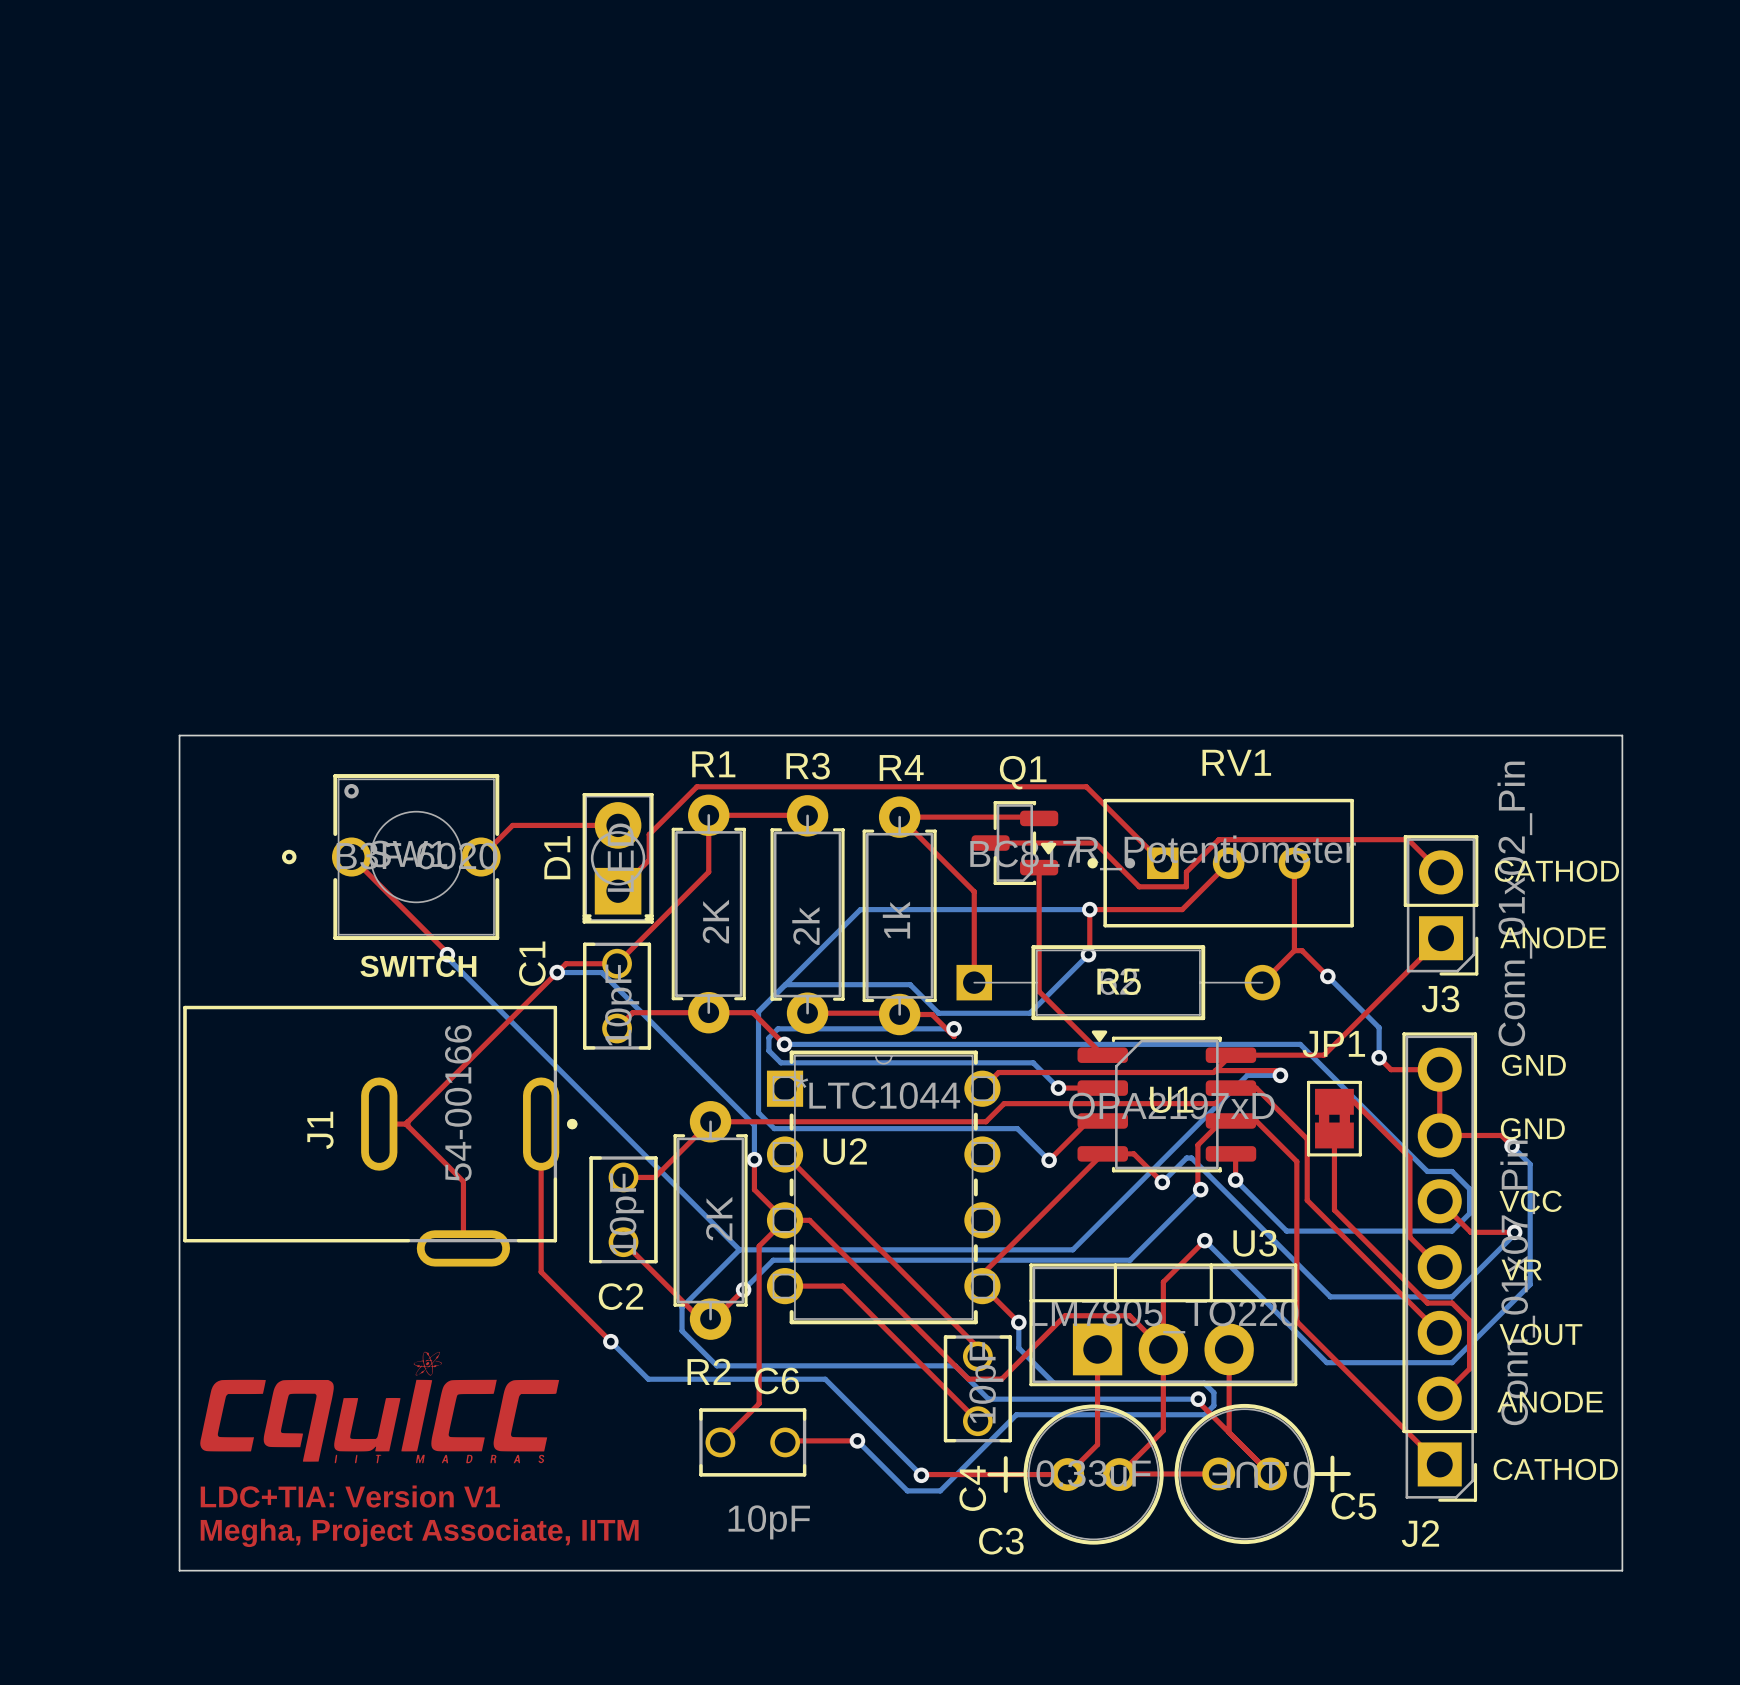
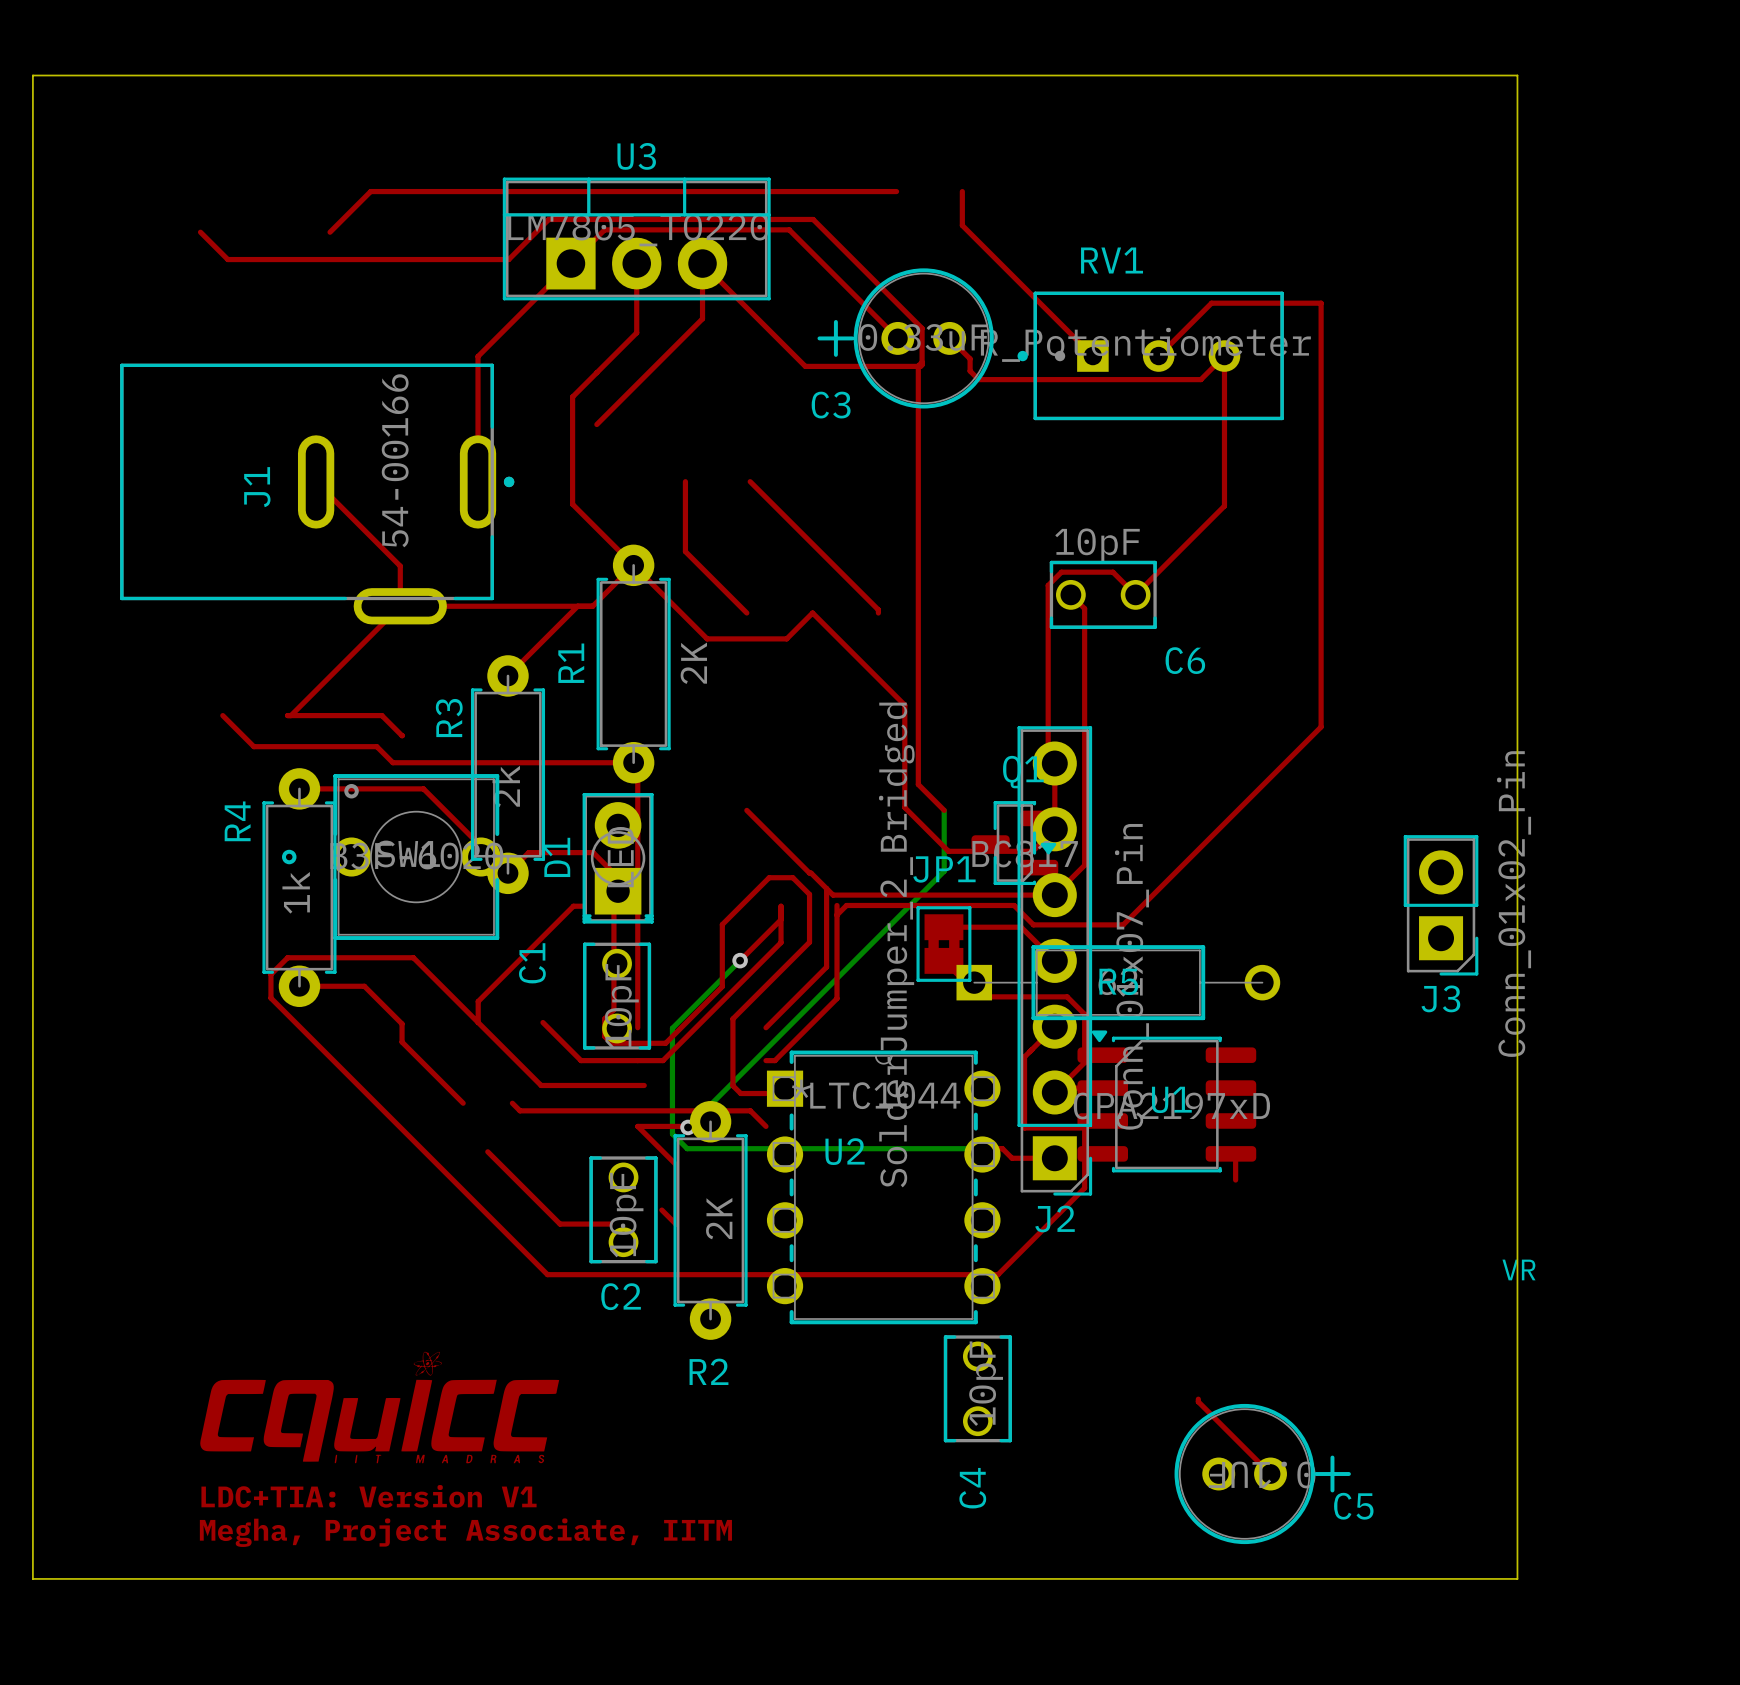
board edge: none -> (32, 75) (1517, 75) (1517, 1578) (32, 1578) (32, 75)
top track: none -> (896, 191) (370, 191) (330, 232)
top track: none -> (962, 191) (962, 225) (1092, 356)
top track: none -> (200, 232) (227, 259) (508, 259) (548, 219) (813, 219) (922, 328) (920, 366) (805, 366) (702, 263) (702, 318) (596, 424)
top track: none -> (636, 263) (636, 332) (572, 396) (572, 504) (707, 638) (786, 638) (812, 613) (904, 705) (904, 807) (948, 851) (1032, 851) (1054, 829) (1054, 763) (1048, 756) (1048, 585) (1061, 572) (1112, 572) (1135, 594) (1224, 506) (1224, 356) (1200, 379) (978, 379) (970, 371) (970, 358) (949, 338)
top track: none -> (897, 338) (789, 229) (604, 229) (478, 356) (478, 481)
top track: none -> (1158, 356) (1211, 303) (1321, 303) (1321, 726) (1123, 924) (1033, 924) (1014, 905) (846, 905) (836, 915)
top track: none -> (922, 362) (918, 366) (918, 784) (944, 810)
top track: none -> (316, 481) (400, 566) (400, 606)
top track: none -> (685, 481) (685, 551) (746, 613)
top track: none -> (750, 481) (878, 609) (878, 613)
top track: none -> (633, 565) (592, 606) (400, 606)
top track: none -> (1070, 594) (1084, 608) (1084, 865) (1054, 895) (833, 895) (746, 810)
top track: none -> (400, 606) (290, 715)
top track: none -> (577, 606) (507, 675)
top track: none -> (222, 715) (253, 746) (376, 746) (392, 762) (633, 762) (637, 766) (637, 1027)
top track: none -> (287, 715) (381, 715) (402, 735)
board edge: (179, 735) (1622, 735) (1622, 1570) (179, 1570) (179, 735) -> none
RV1 name position: RV1 (1236, 762) -> RV1 (1112, 260)
R1 name rotation: 0° (713, 764) -> 90° counterclockwise (571, 663)
R1 name position: R1 (713, 764) -> R1 (571, 663)
R3 name rotation: 0° (808, 766) -> 90° counterclockwise (449, 718)
R3 name position: R3 (808, 766) -> R3 (449, 718)
R4 name rotation: 0° (901, 767) -> 90° counterclockwise (237, 821)
R4 name position: R4 (901, 767) -> R4 (237, 821)
top track: none -> (299, 788) (423, 788) (507, 873) (528, 852) (593, 852) (613, 873) (613, 1009) (604, 1018) (604, 1036) (611, 1043) (665, 1043) (722, 986) (722, 924) (769, 877) (792, 877) (809, 894) (809, 942) (732, 1018) (732, 1085) (740, 1093) (765, 1093)
bottom track: none -> (944, 810) (944, 871) (688, 1127)
top track: (797, 815) (708, 815) (708, 872) (617, 963) (566, 963) (405, 1124) (379, 1124) -> none
top track: (1037, 817) (899, 817) (974, 891) (974, 982) (963, 972) -> none
top track: (618, 825) (512, 825) (481, 857) -> none
top track: (990, 843) (1095, 843) (1139, 886) (1186, 886) (1186, 872) (1218, 839) (1408, 839) (1441, 872) -> none
top track: (351, 857) (447, 954) -> none
top track: (1162, 863) (1086, 786) (696, 786) (649, 834) (649, 860) (618, 891) -> none
RV1 position: (1220, 863) -> (1150, 355)
top track: (1228, 863) (1182, 909) (1089, 909) (1088, 954) -> none
top track: (1294, 863) (1294, 950) -> none
top track: (1039, 867) (1039, 991) (1102, 1055) -> none
text: CATHOD (1556, 871) -> none
top track: none -> (826, 888) (826, 967) (765, 1027)
top track: none -> (836, 905) (836, 998) (774, 1060) (765, 1060)
top track: none -> (583, 906) (573, 906) (478, 1001) (478, 1022)
top track: none -> (781, 906) (781, 942) (663, 1060) (581, 1060) (542, 1022)
bottom track: (1089, 909) (860, 909) (758, 1011) (758, 1112) (774, 1128) (1017, 1128) (1049, 1160) -> none
via: (1089, 909) -> none
R1 position: (708, 914) -> (633, 664)
R3 position: (807, 914) -> (507, 774)
R4 position: (899, 915) -> (299, 887)
top track: none -> (781, 919) (740, 960)
R1 value position: 2K (715, 921) -> 2K (693, 663)
top track: none -> (943, 927) (1021, 927) (1054, 960)
text: ANODE (1553, 937) -> none
top track: (1441, 938) (1324, 1055) (1230, 1055) (1213, 1072) (998, 1072) (982, 1088) -> none
JP1 value: none -> SolderJumper_2_Bridged (896, 944)
top track: (1294, 950) (1302, 950) (1327, 976) -> none
top track: (1294, 950) (1262, 982) -> none
bottom track: (447, 954) (447, 957) (739, 1249) -> none
via: (447, 954) -> none
bottom track: (1088, 954) (1029, 1013) (938, 1013) (910, 984) (785, 984) -> none
via: (1088, 954) -> none
bottom track: none -> (740, 960) (672, 1028) (672, 1133) (687, 1148) (995, 1148)
via: none -> (740, 960)
top track: none -> (943, 960) (979, 996) (1067, 996) (1084, 1014) (1084, 1062) (1054, 1092)
text: SWITCH (418, 966) -> none
bottom track: (557, 972) (601, 972) (754, 1125) (754, 1159) -> none
via: (557, 972) -> none
bottom track: (1327, 976) (1379, 1027) (1379, 1057) -> none
via: (1327, 976) -> none
top track: none -> (299, 986) (364, 986) (402, 1023) (402, 1042) (463, 1103)
top track: (797, 1013) (932, 1014) (954, 1036) (954, 1028) -> none
top track: none -> (1054, 1026) (1024, 1056) (1024, 1127) (1084, 1128) (1084, 1188) (998, 1274) (547, 1274) (270, 998) (270, 974) (287, 957) (413, 957) (541, 1085) (644, 1085)
top track: (617, 1028) (632, 1012) (752, 1012) (784, 1044) -> none
bottom track: (954, 1028) (778, 1028) (768, 1037) (768, 1050) (780, 1062) (1033, 1062) (1058, 1088) -> none
via: (954, 1028) -> none
bottom track: (784, 1044) (1300, 1044) (1427, 1171) (1452, 1171) (1469, 1188) (1469, 1213) (1452, 1231) (1286, 1231) (1235, 1180) -> none
via: (784, 1044) -> none
top track: (1379, 1057) (1391, 1069) (1439, 1069) (1439, 1135) (1501, 1135) (1512, 1146) -> none
via: (1379, 1057) -> none
text: GND (1533, 1065) -> none
top track: (1215, 1070) (1275, 1070) (1280, 1075) -> none
bottom track: (1280, 1075) (1247, 1075) (1072, 1249) (739, 1249) -> none
via: (1280, 1075) -> none
via: (1058, 1088) -> none
top track: (1334, 1101) (1353, 1101) (1409, 1157) (1409, 1237) (1439, 1267) -> none
top track: none -> (512, 1103) (520, 1110) (750, 1110) (765, 1126)
JP1 position: (1334, 1118) -> (943, 944)
top track: (1102, 1120) (1088, 1120) (1049, 1160) -> none
top track: (407, 1121) (407, 1126) (463, 1181) (463, 1248) -> none
top track: (541, 1124) (541, 1271) (610, 1341) -> none
top track: none -> (688, 1127) (637, 1126) (675, 1164) (675, 1224) (661, 1210)
via: none -> (688, 1127)
text: GND (1532, 1128) -> none
top track: (1334, 1135) (1334, 1210) (1427, 1303) (1452, 1303) (1469, 1320) (1469, 1368) (1439, 1398) -> none
J1 position: (380, 1136) -> (317, 494)
bottom track: (1512, 1146) (1530, 1164) (1530, 1284) (1452, 1362) (1326, 1362) (1204, 1240) -> none
via: (1512, 1146) -> none
top track: none -> (995, 1148) (1002, 1148) (1012, 1158) (1054, 1158)
top track: none -> (487, 1151) (560, 1224) (610, 1224)
top track: (785, 1154) (977, 1347) (977, 1356) -> none
top track: (754, 1159) (754, 1189) (785, 1220) -> none
via: (754, 1159) -> none
via: (1049, 1160) -> none
top track: (623, 1177) (654, 1177) (710, 1121) (986, 1121) (1004, 1103) (1215, 1103) (1230, 1088) (1256, 1088) (1307, 1139) (1307, 1200) (1439, 1332) -> none
via: (1235, 1180) -> none
top track: (1162, 1182) (1133, 1153) (1102, 1153) (982, 1274) (982, 1286) (1018, 1322) -> none
bottom track: (1162, 1182) (1186, 1158) (1191, 1158) (1330, 1296) (1452, 1296) (1514, 1232) -> none
via: (1162, 1182) -> none
top track: (1200, 1189) (1197, 1186) (1197, 1145) (1221, 1120) (1256, 1120) (1296, 1161) (1296, 1321) (1439, 1464) -> none
bottom track: (1200, 1189) (1130, 1260) (773, 1260) (743, 1289) -> none
via: (1200, 1189) -> none
top track: (1439, 1201) (1470, 1232) (1514, 1232) -> none
text: VCC (1530, 1201) -> none
top track: (785, 1220) (809, 1220) (968, 1379) (1001, 1379) (1065, 1315) (1129, 1315) (1163, 1349) -> none
top track: (785, 1220) (759, 1246) (759, 1403) (720, 1442) -> none
via: (1514, 1232) -> none
top track: (1204, 1240) (1163, 1282) (1163, 1430) (1119, 1474) -> none
via: (1204, 1240) -> none
top track: (623, 1242) (700, 1319) (714, 1319) (743, 1289) -> none
U3 name position: U3 (1255, 1243) -> U3 (636, 156)
bottom track: (739, 1249) (682, 1307) (682, 1330) (716, 1365) (955, 1365) (988, 1399) (1198, 1399) -> none
J2 position: (1439, 1267) -> (1054, 960)
top track: (785, 1286) (842, 1286) (977, 1421) -> none
via: (743, 1289) -> none
bottom track: (1018, 1322) (1018, 1348) (1053, 1383) (1204, 1383) (1213, 1392) (1213, 1405) (1204, 1414) (1016, 1414) (940, 1490) (907, 1490) (857, 1440) -> none
via: (1018, 1322) -> none
U3 position: (1163, 1324) -> (636, 238)
text: VOUT (1540, 1334) -> none
bottom track: (610, 1341) (648, 1379) (825, 1379) (921, 1475) -> none
via: (610, 1341) -> none
top track: (1097, 1349) (1097, 1444) (1067, 1474) (921, 1475) -> none
top track: (1229, 1349) (1229, 1432) -> none
C6 name position: C6 (776, 1380) -> C6 (1185, 660)
via: (1198, 1399) -> none
text: ANODE (1550, 1402) -> none
top track: (857, 1440) (786, 1440) (785, 1442) -> none
via: (857, 1440) -> none
C6 position: (752, 1442) -> (1103, 594)
text: CATHOD (1555, 1469) -> none
C3 position: (1075, 1474) -> (905, 338)
top track: (1124, 1474) (1218, 1474) -> none
via: (921, 1475) -> none
C6 value position: 10pF (769, 1522) -> 10pF (1097, 545)
J2 name position: J2 (1420, 1533) -> J2 (1055, 1218)

